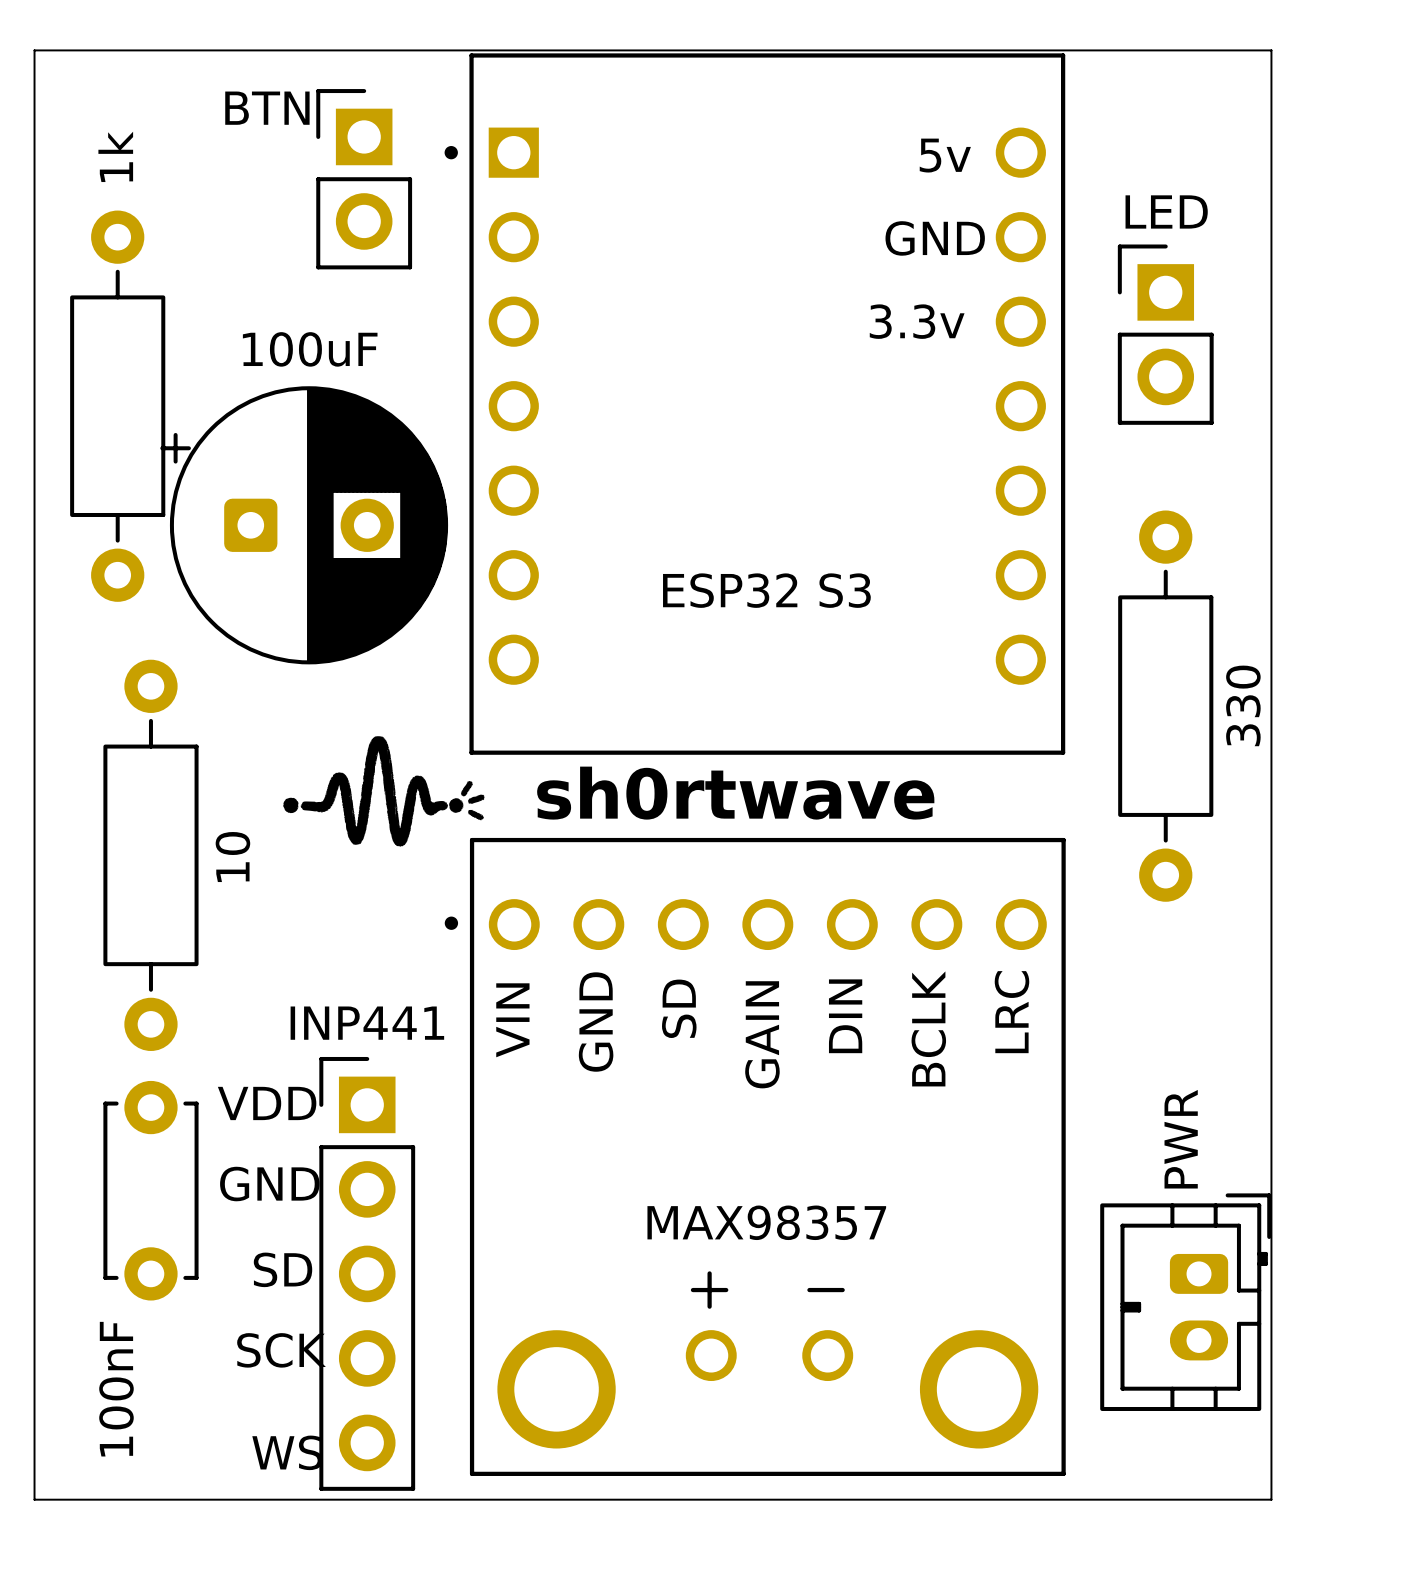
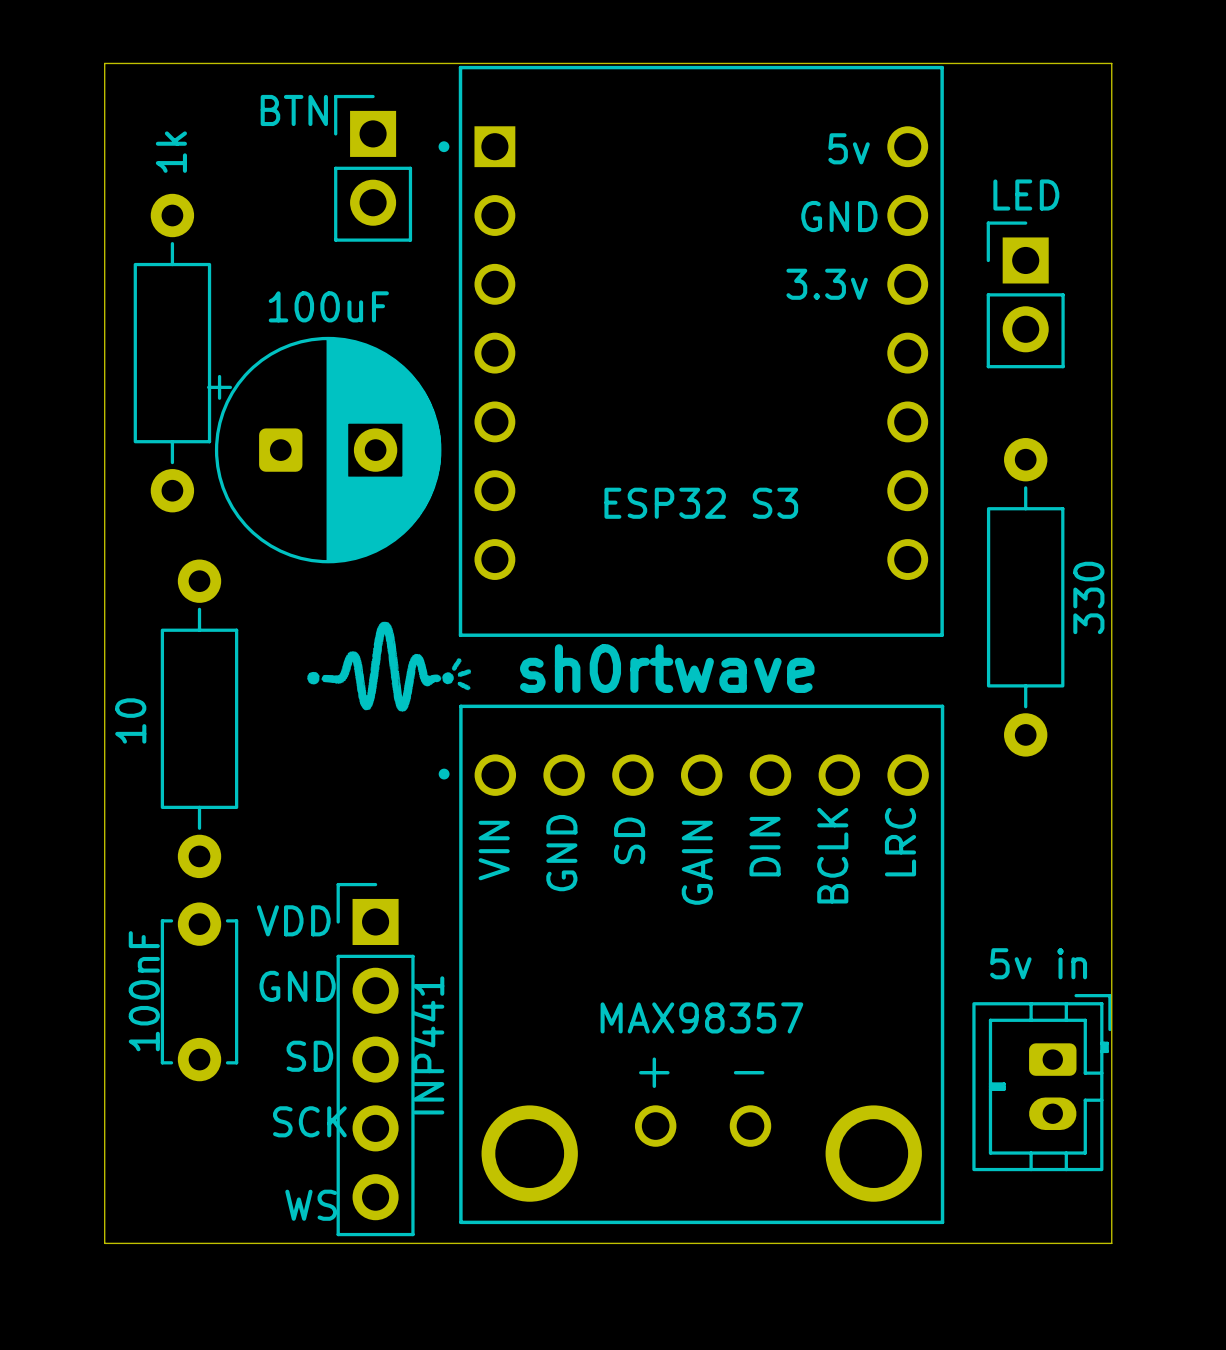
10 name position: 10 (232, 857) -> 10 (130, 720)
INP441 name rotation: 0° (367, 1023) -> 90° counterclockwise (428, 1045)
INP441 name position: INP441 (367, 1023) -> INP441 (428, 1045)
PWR name: PWR (1181, 1139) -> 5v in (1038, 963)
100nF name position: 100nF (116, 1389) -> 100nF (144, 991)

